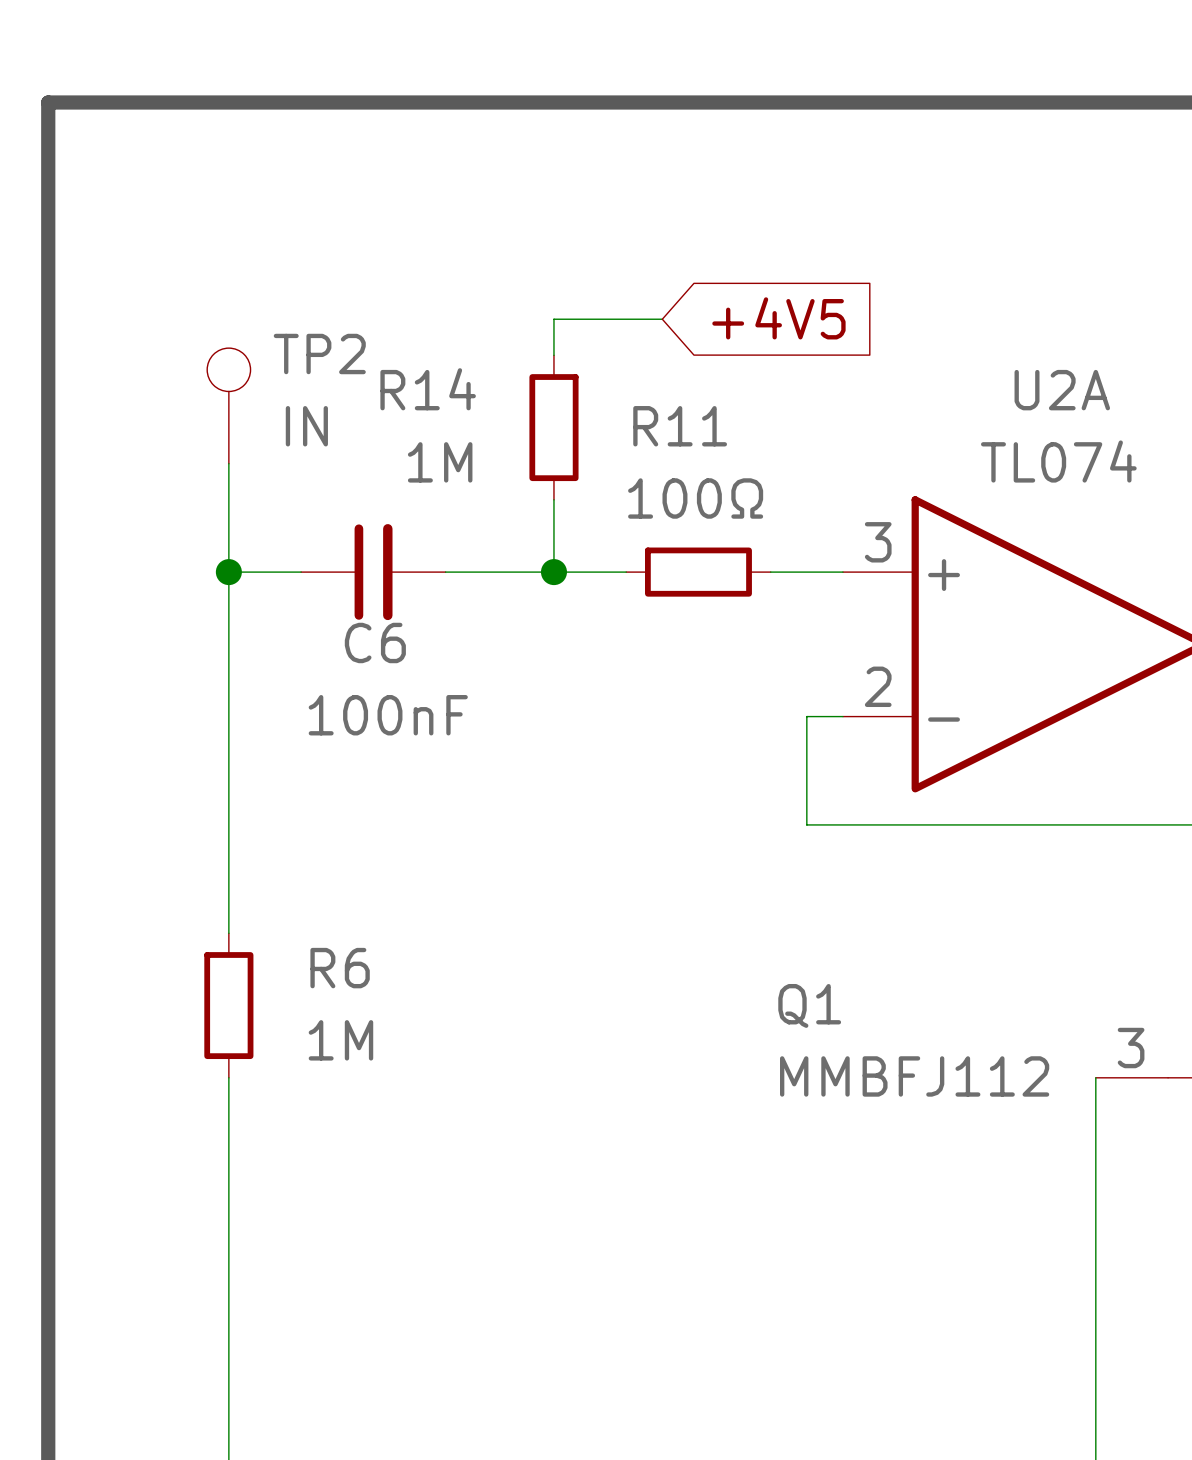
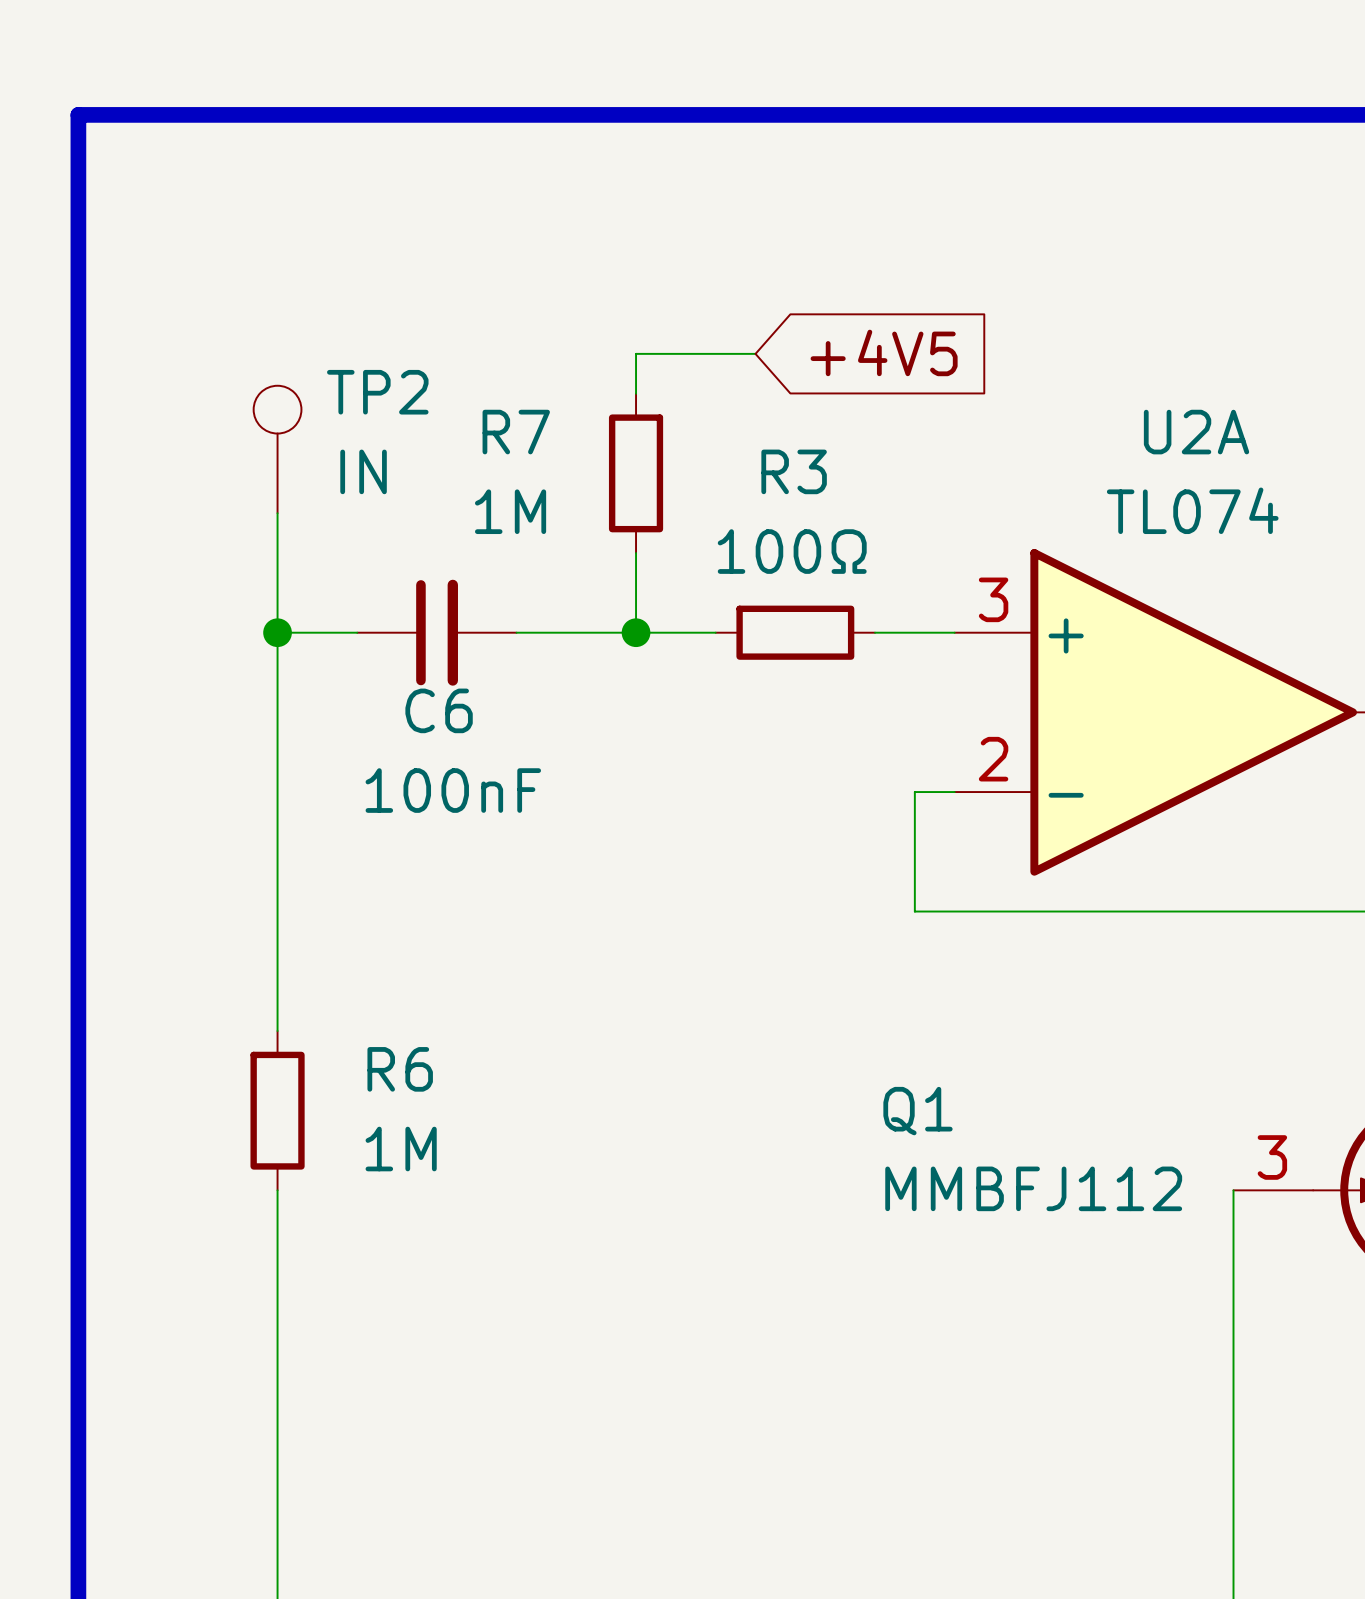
R14 name: R14 (428, 389) -> R7 (516, 432)
R11 name: R11 (680, 426) -> R3 (794, 471)

